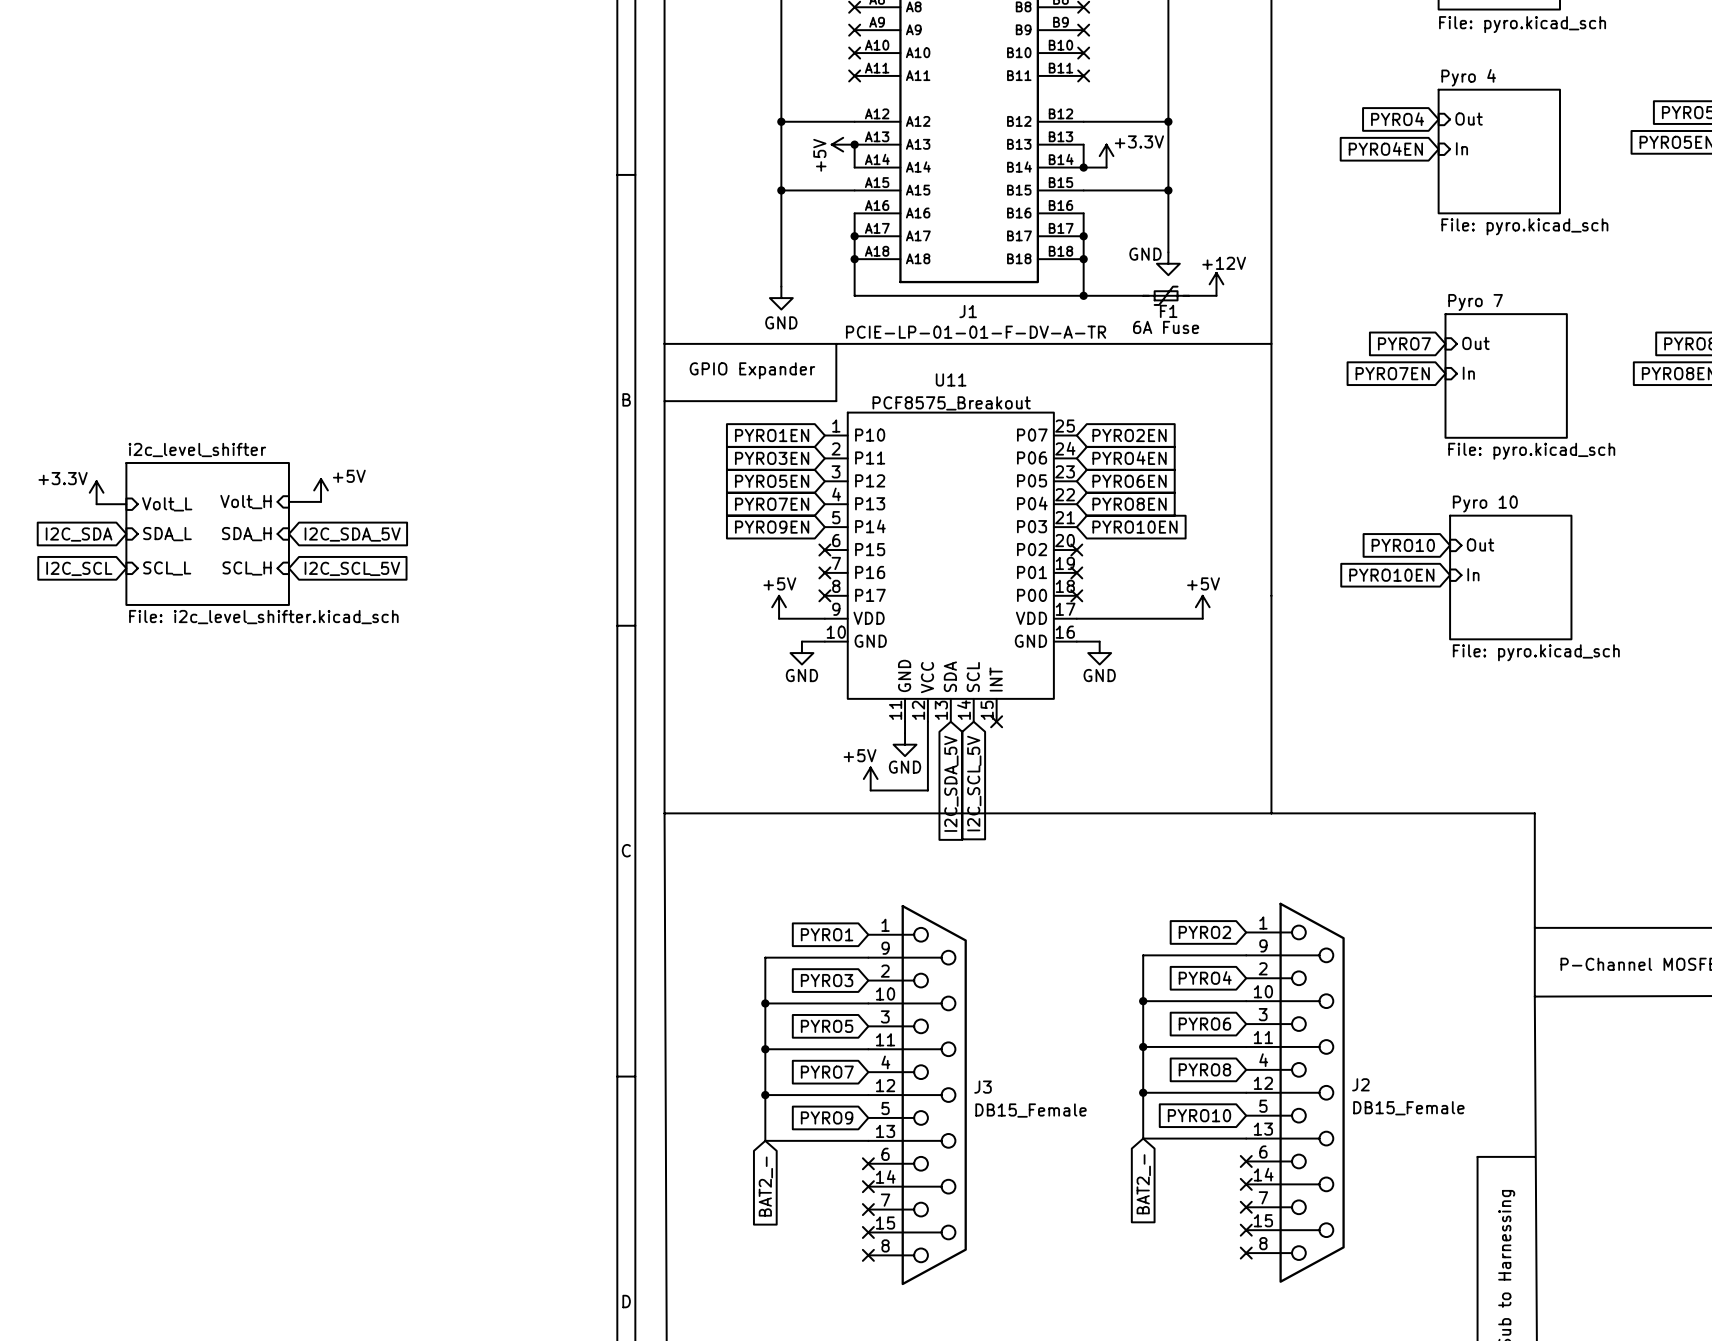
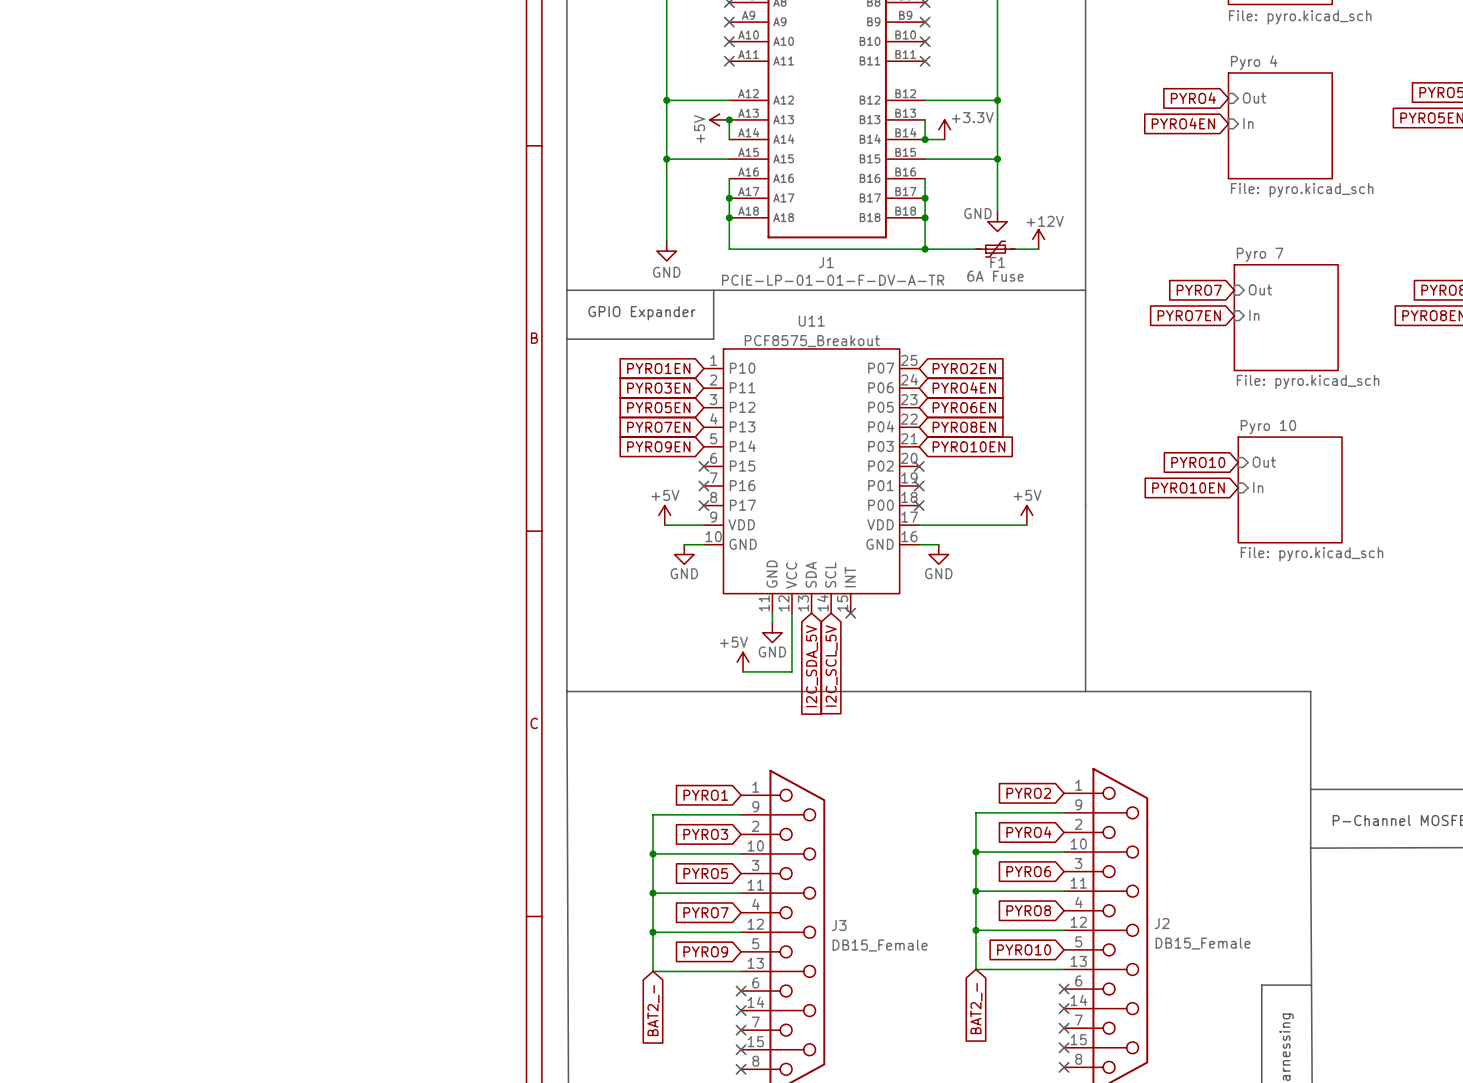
power symbol: +5V (321, 490) -> none
power symbol: +3.3V (96, 492) -> none
wire: (288, 501) (321, 501) -> none
sheet pin: Volt_H (245, 502) -> none
wire: (96, 504) (126, 504) -> none
sheet pin: Volt_L (167, 504) -> none
sheet i2c_level_shifter: File: i2c_level_shifter.kicad_sch (207, 533) -> none
global label: I2C_SDA (79, 534) -> none
sheet pin: SDA_L (167, 534) -> none
sheet pin: SDA_H (246, 534) -> none
global label: I2C_SDA_5V (352, 534) -> none
global label: I2C_SCL (79, 568) -> none
sheet pin: SCL_L (167, 568) -> none
sheet pin: SCL_H (247, 568) -> none
global label: I2C_SCL_5V (352, 568) -> none

